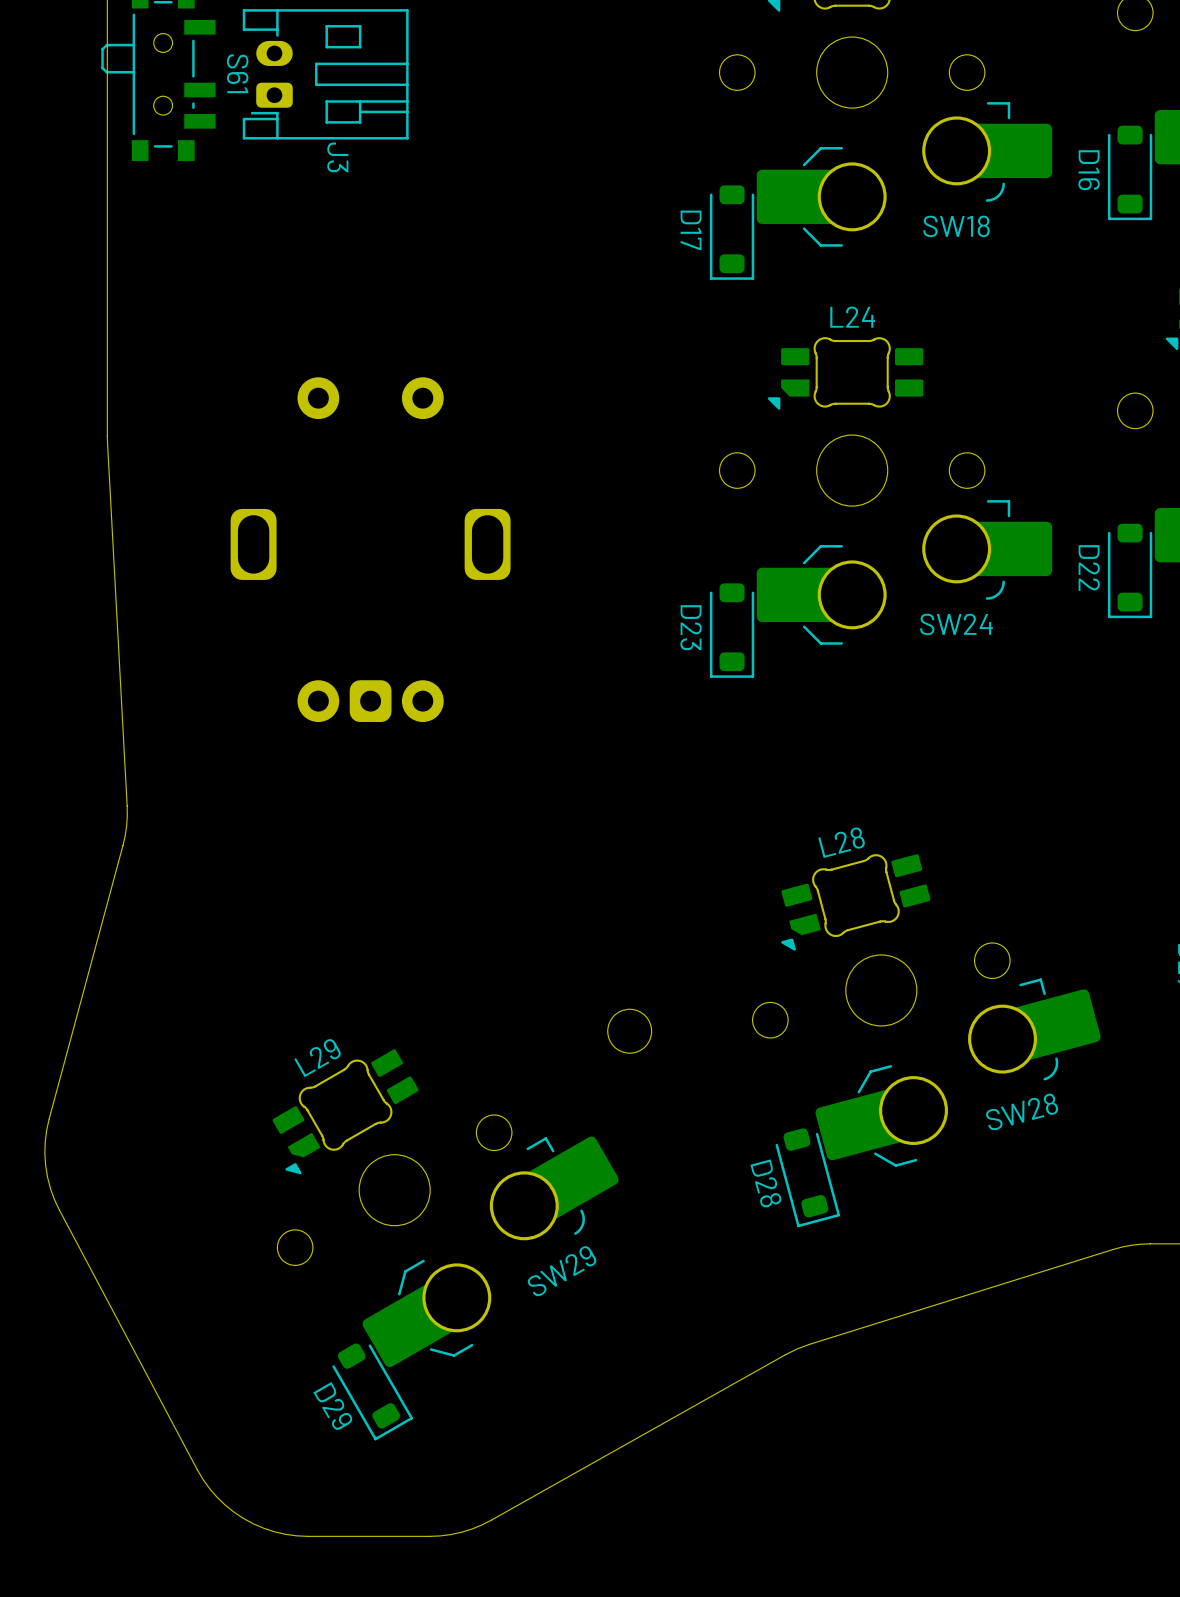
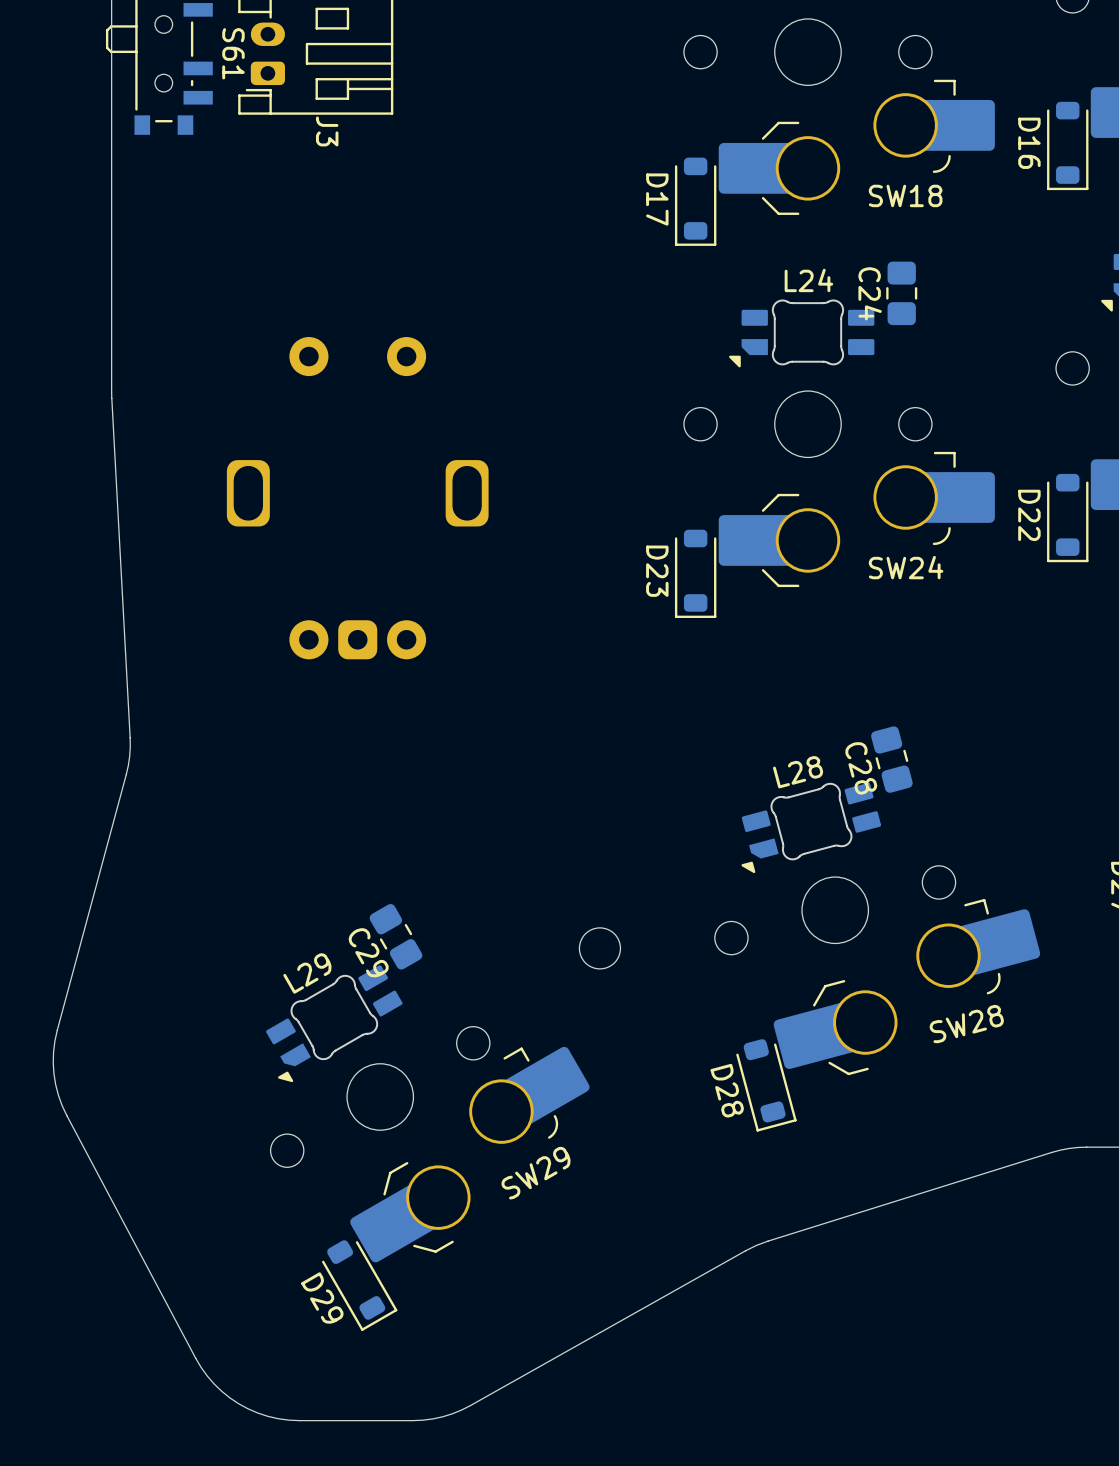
C24: none -> (901, 293)
C28: none -> (891, 759)
C29: none -> (396, 936)

